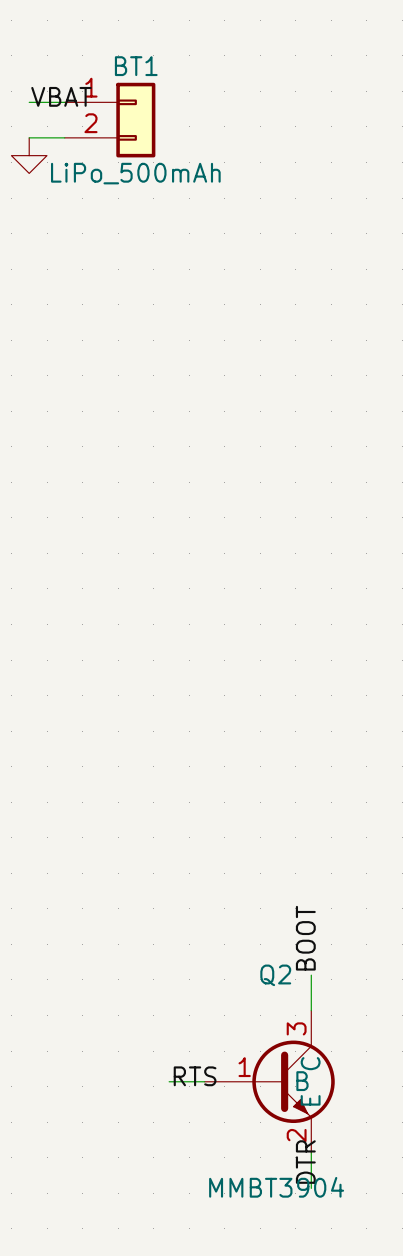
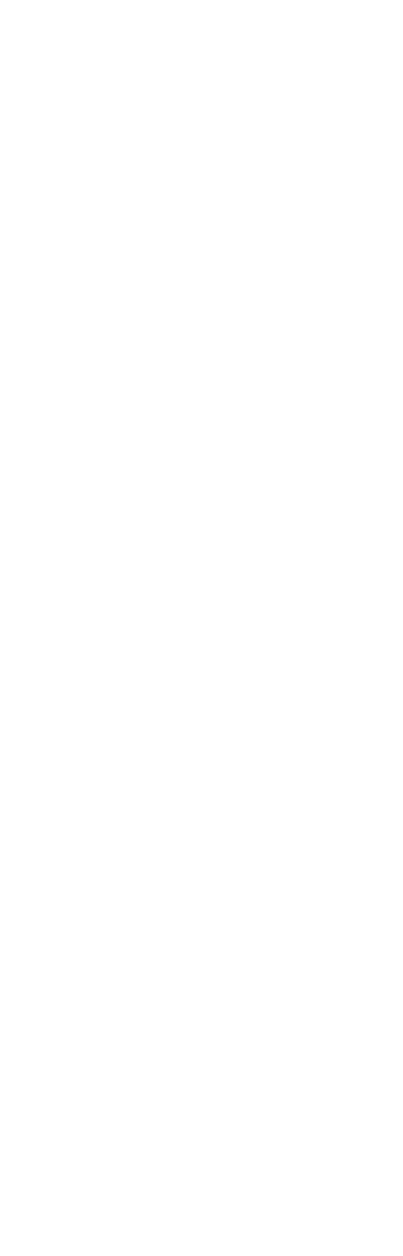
label: VBAT (61, 96) -> none
wire: (29, 102) (64, 102) -> none
BT1: LiPo_500mAh (110, 120) -> none
wire: (29, 137) (64, 137) -> none
power symbol: (29, 155) -> none
label: BOOT (305, 938) -> none
wire: (311, 975) (311, 1010) -> none
label: RTS (195, 1076) -> none
wire: (169, 1081) (204, 1081) -> none
Q2: MMBT3904 (269, 1081) -> none
wire: (311, 1152) (311, 1188) -> none
label: DTR (305, 1162) -> none

